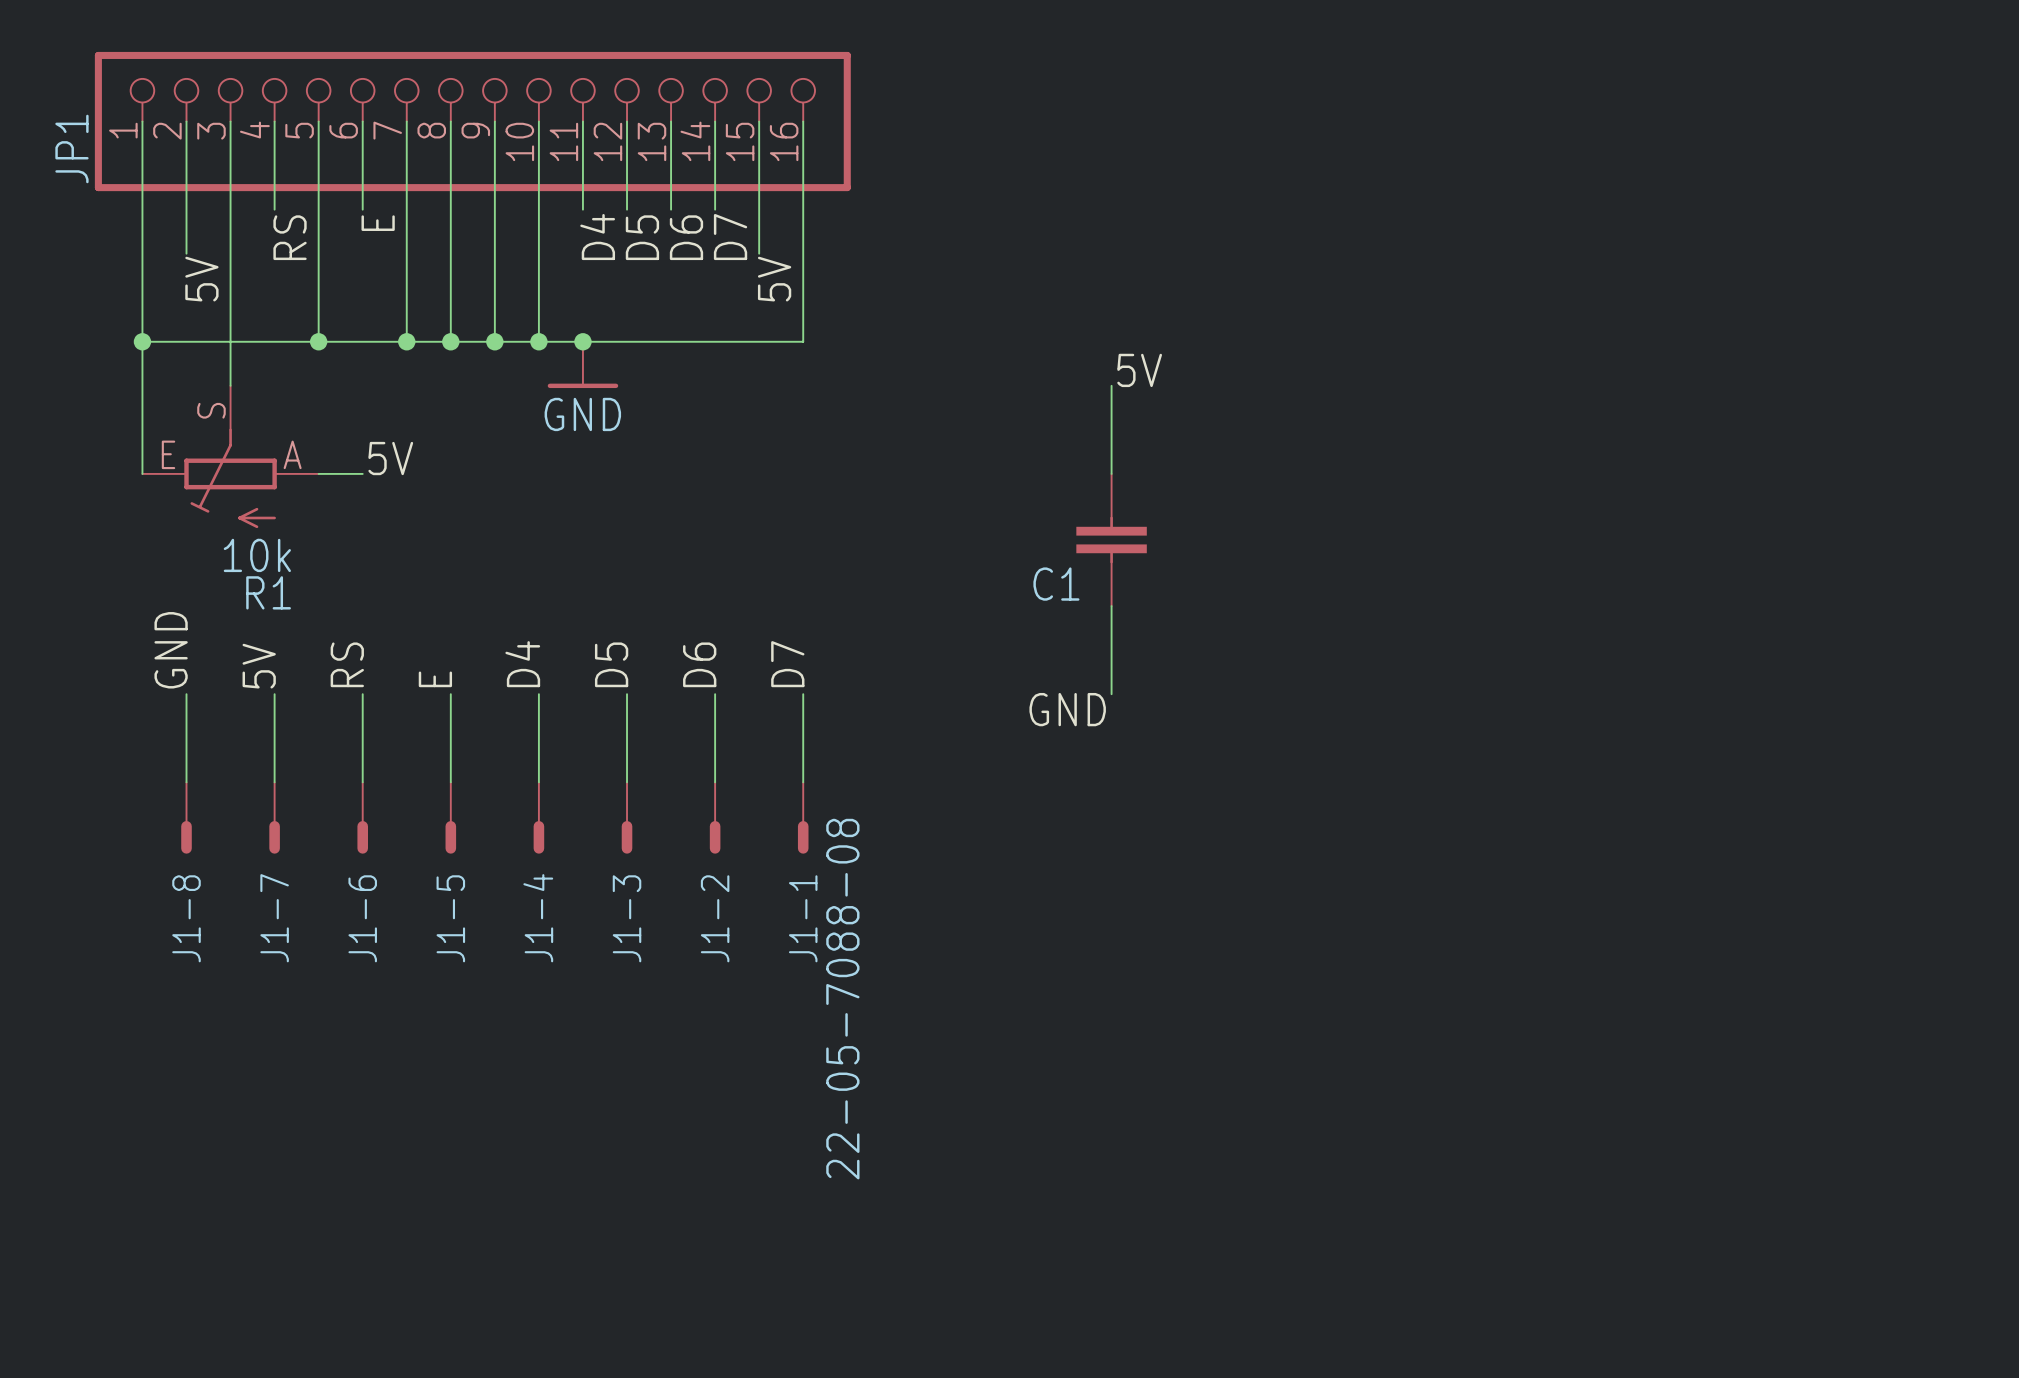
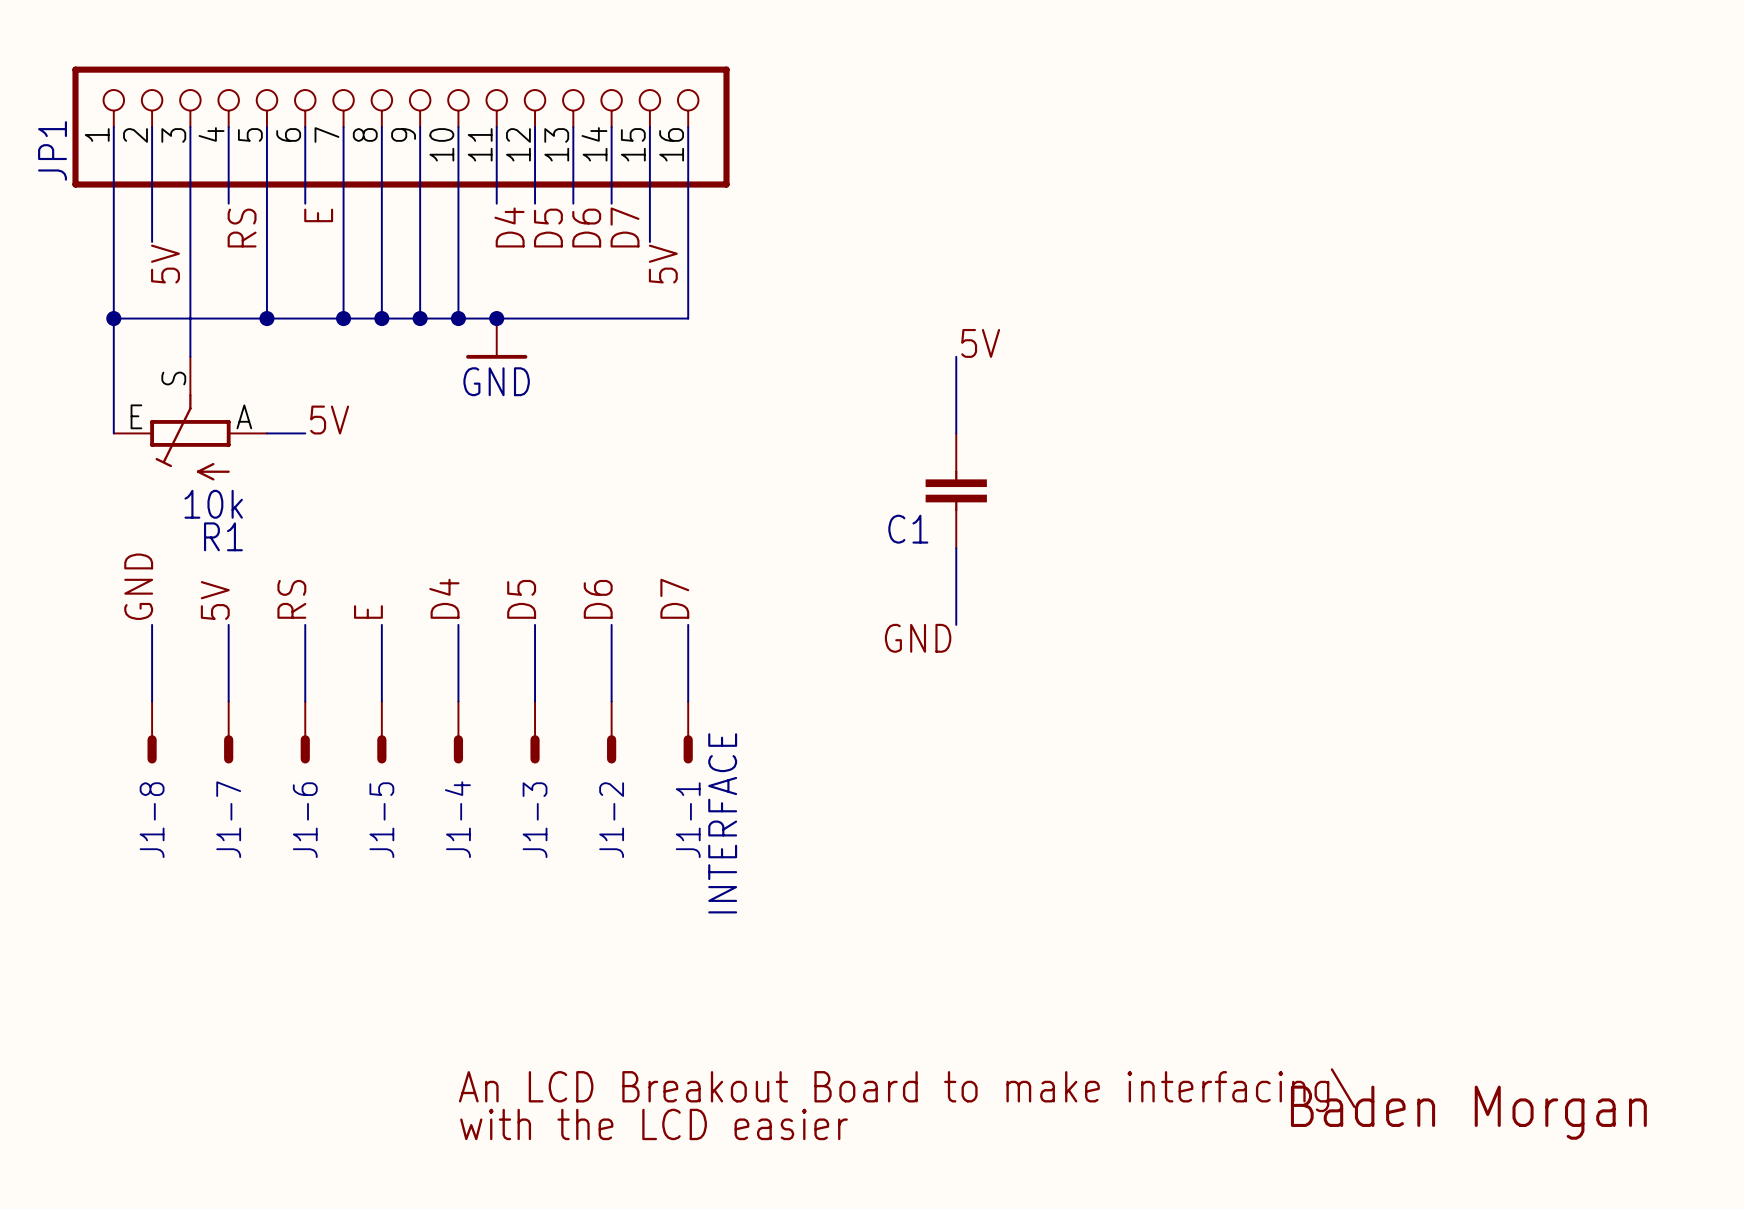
J1-1 value: 22-05-7088-08 (842, 999) -> INTERFACE (722, 823)
text: none -> An LCD Breakout Board to make interfacing\ (907, 1090)
text: none -> Baden Morgan (1468, 1112)
text: none -> with the LCD easier (654, 1124)

